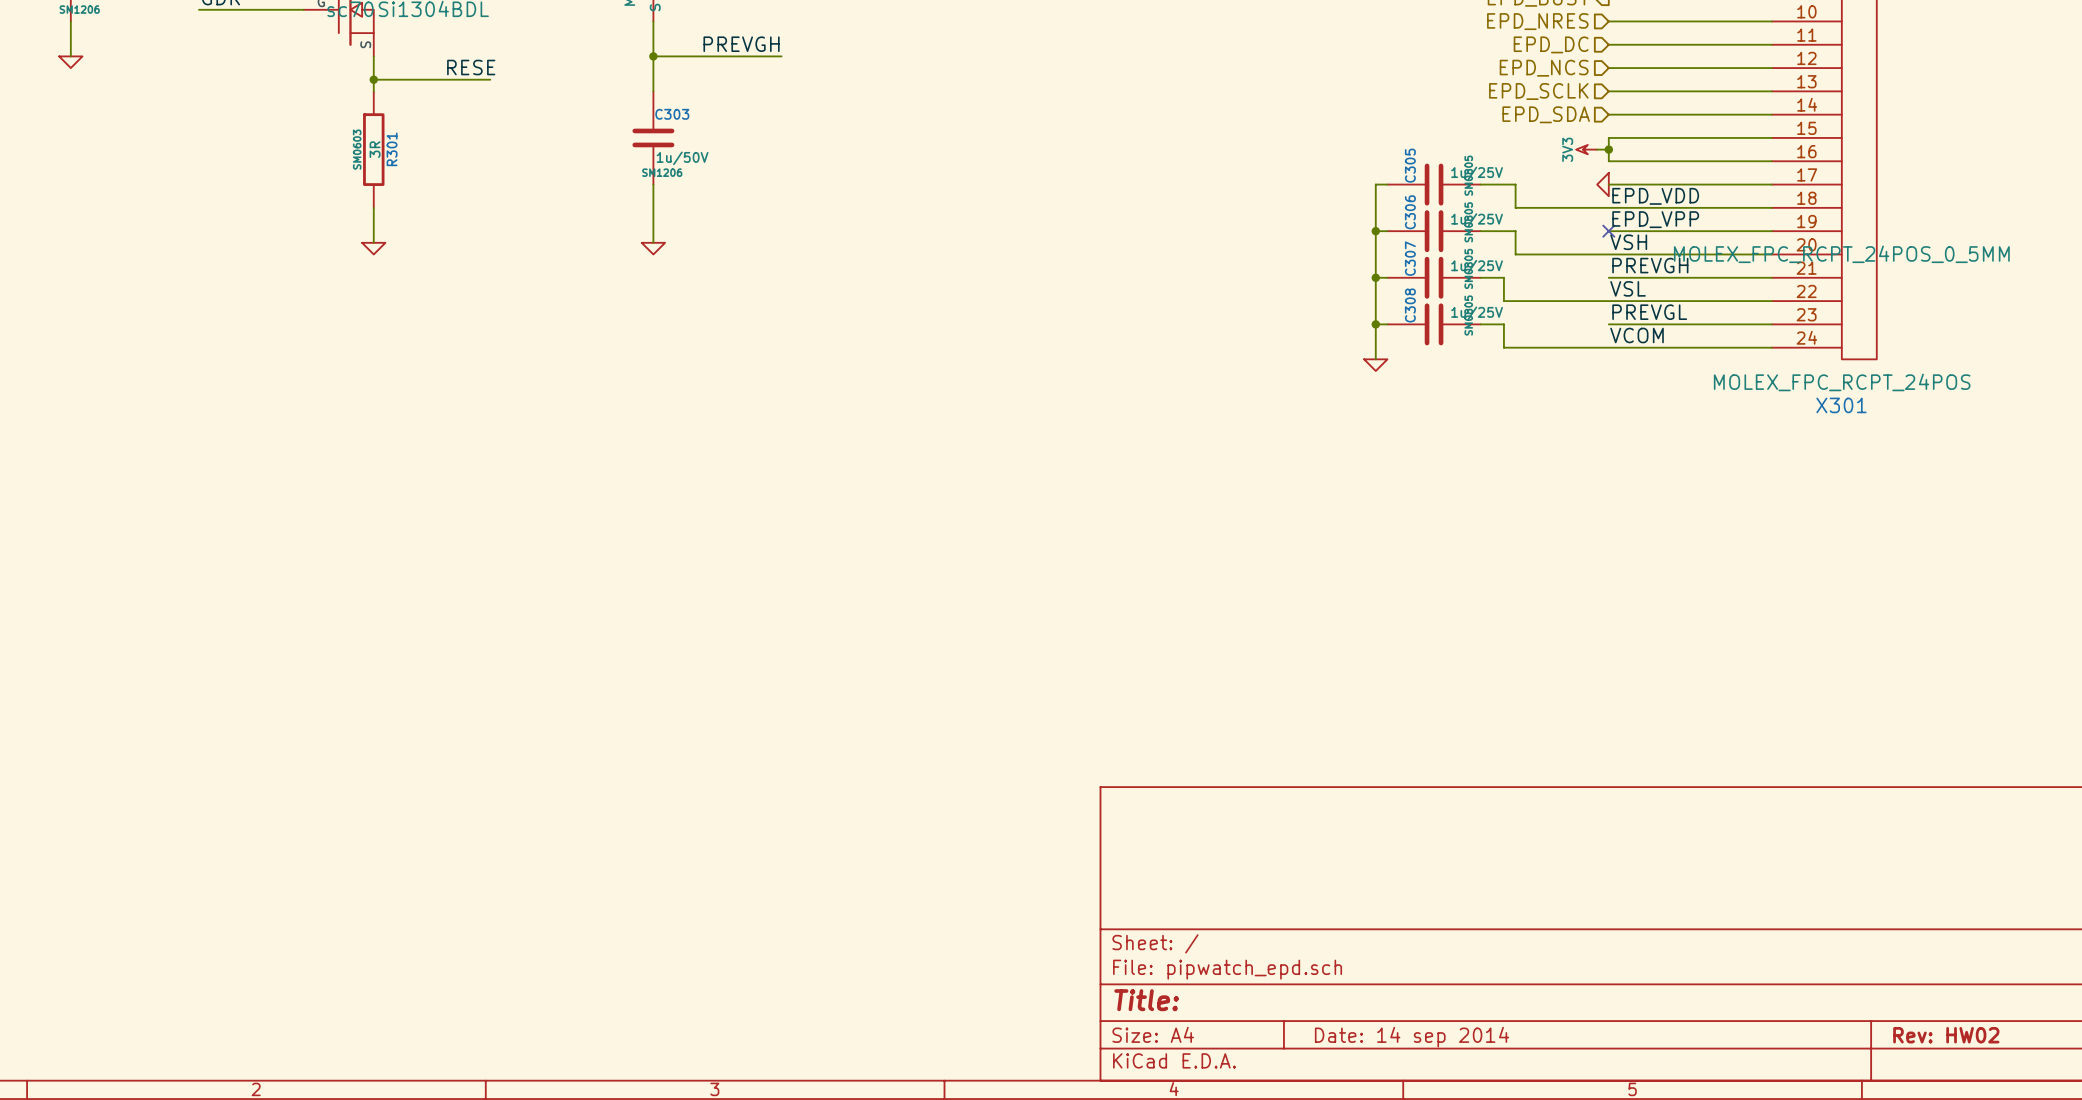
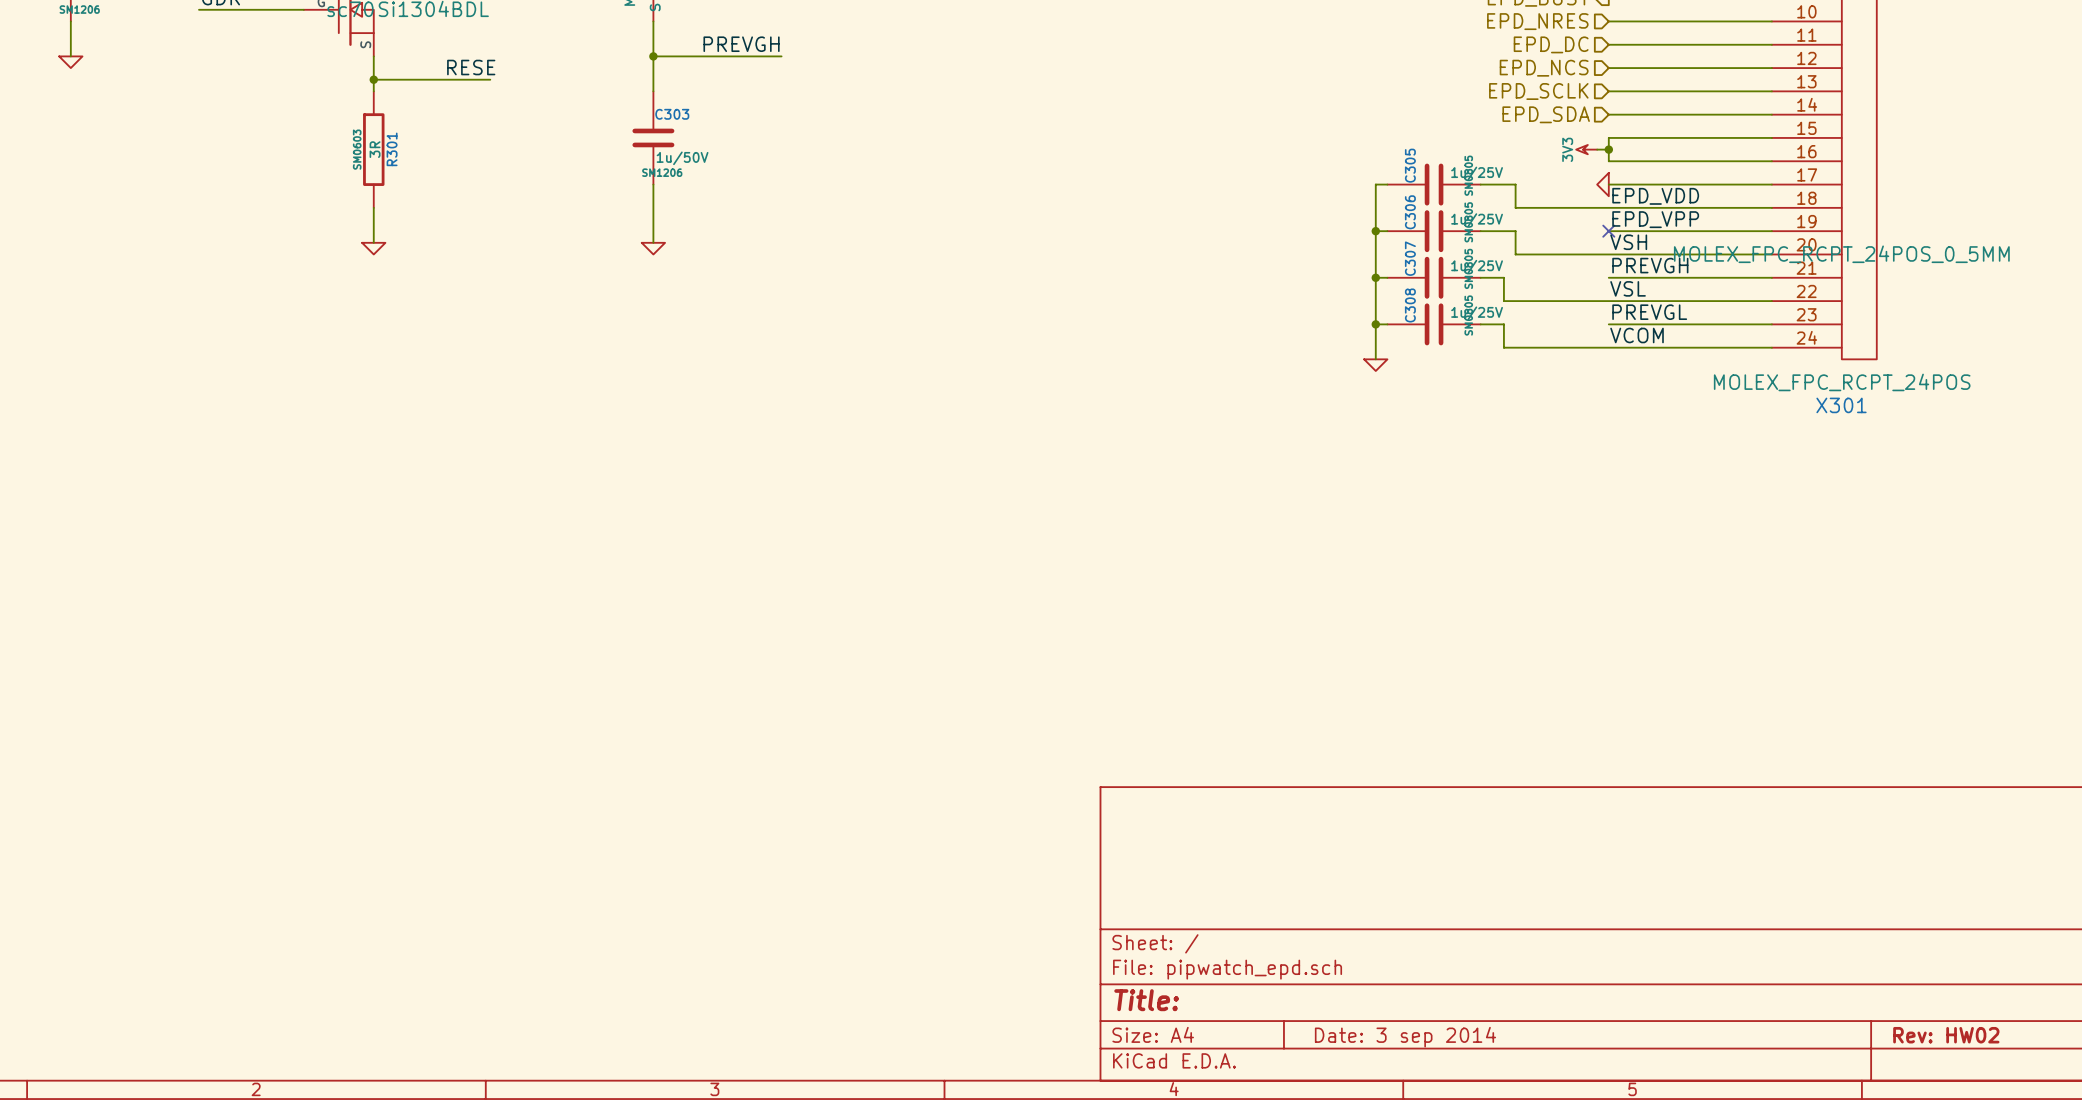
title block: Date: 14 sep 2014 (1412, 1037) -> Date: 3 sep 2014 (1405, 1037)

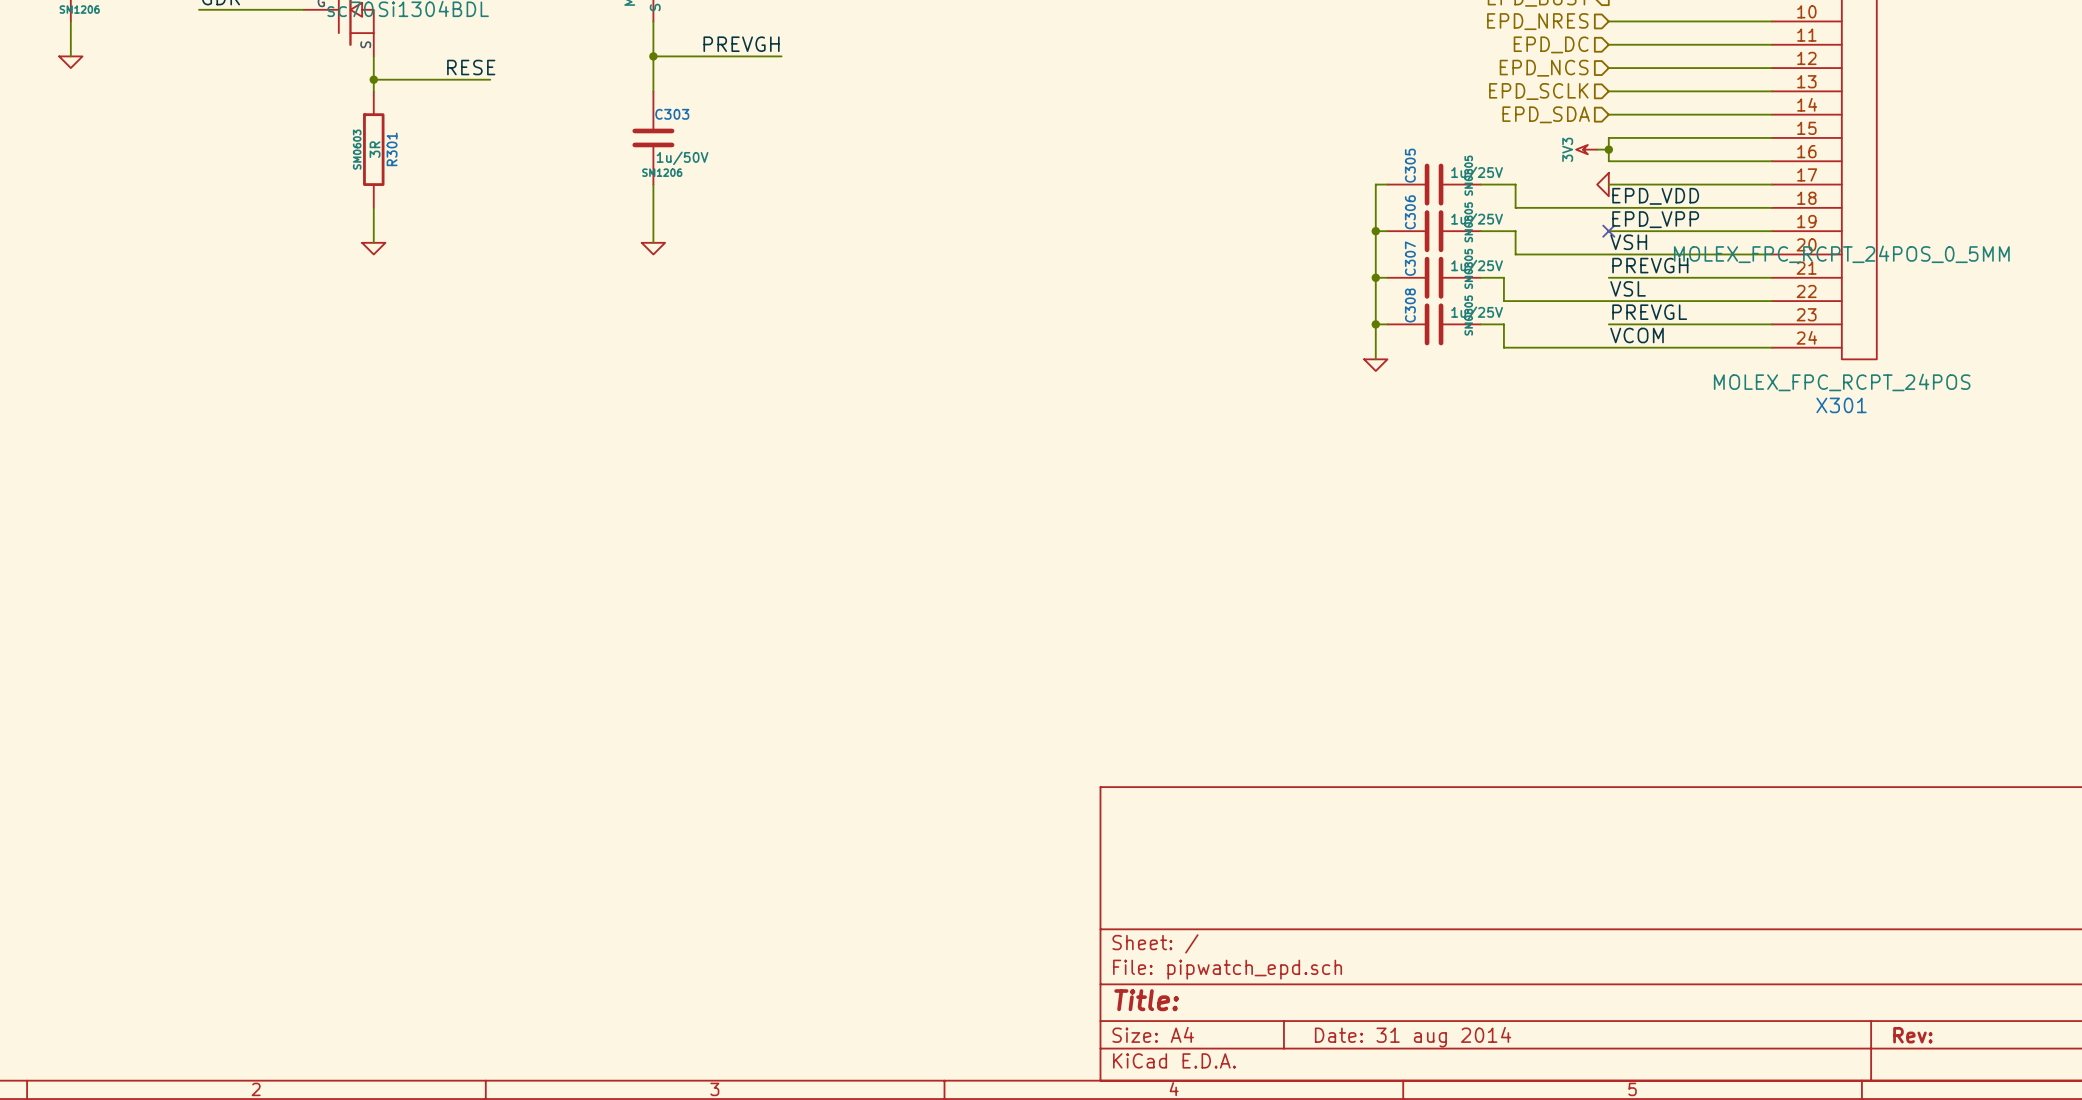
title block: Rev: HW02 (1946, 1035) -> Rev: (1912, 1035)
title block: Date: 3 sep 2014 (1405, 1037) -> Date: 31 aug 2014 (1413, 1037)

